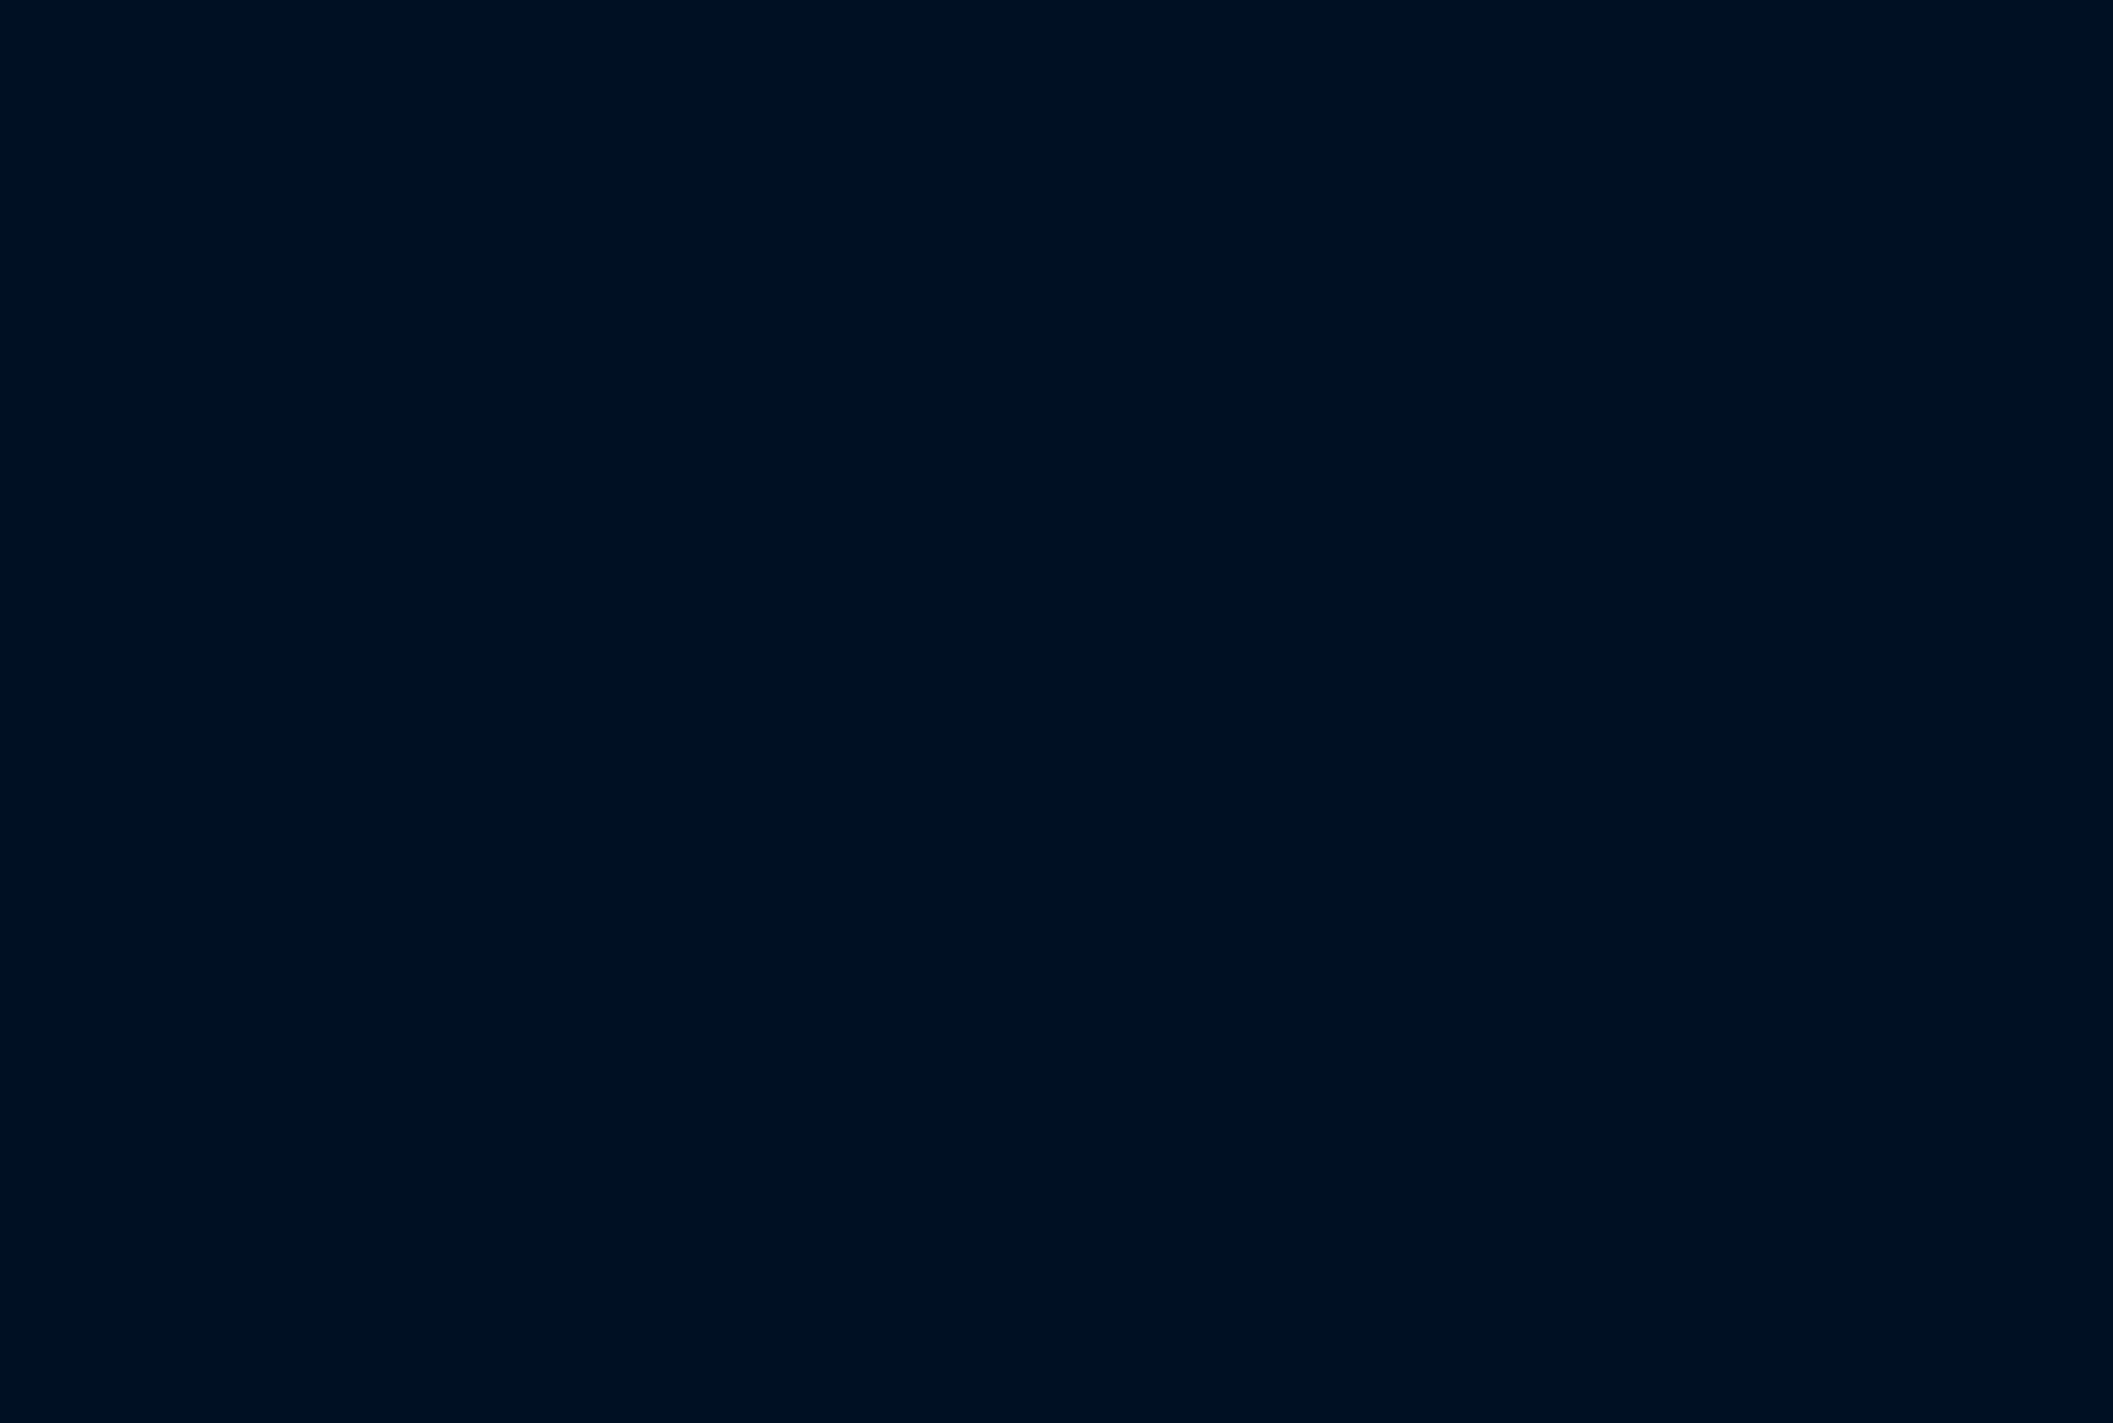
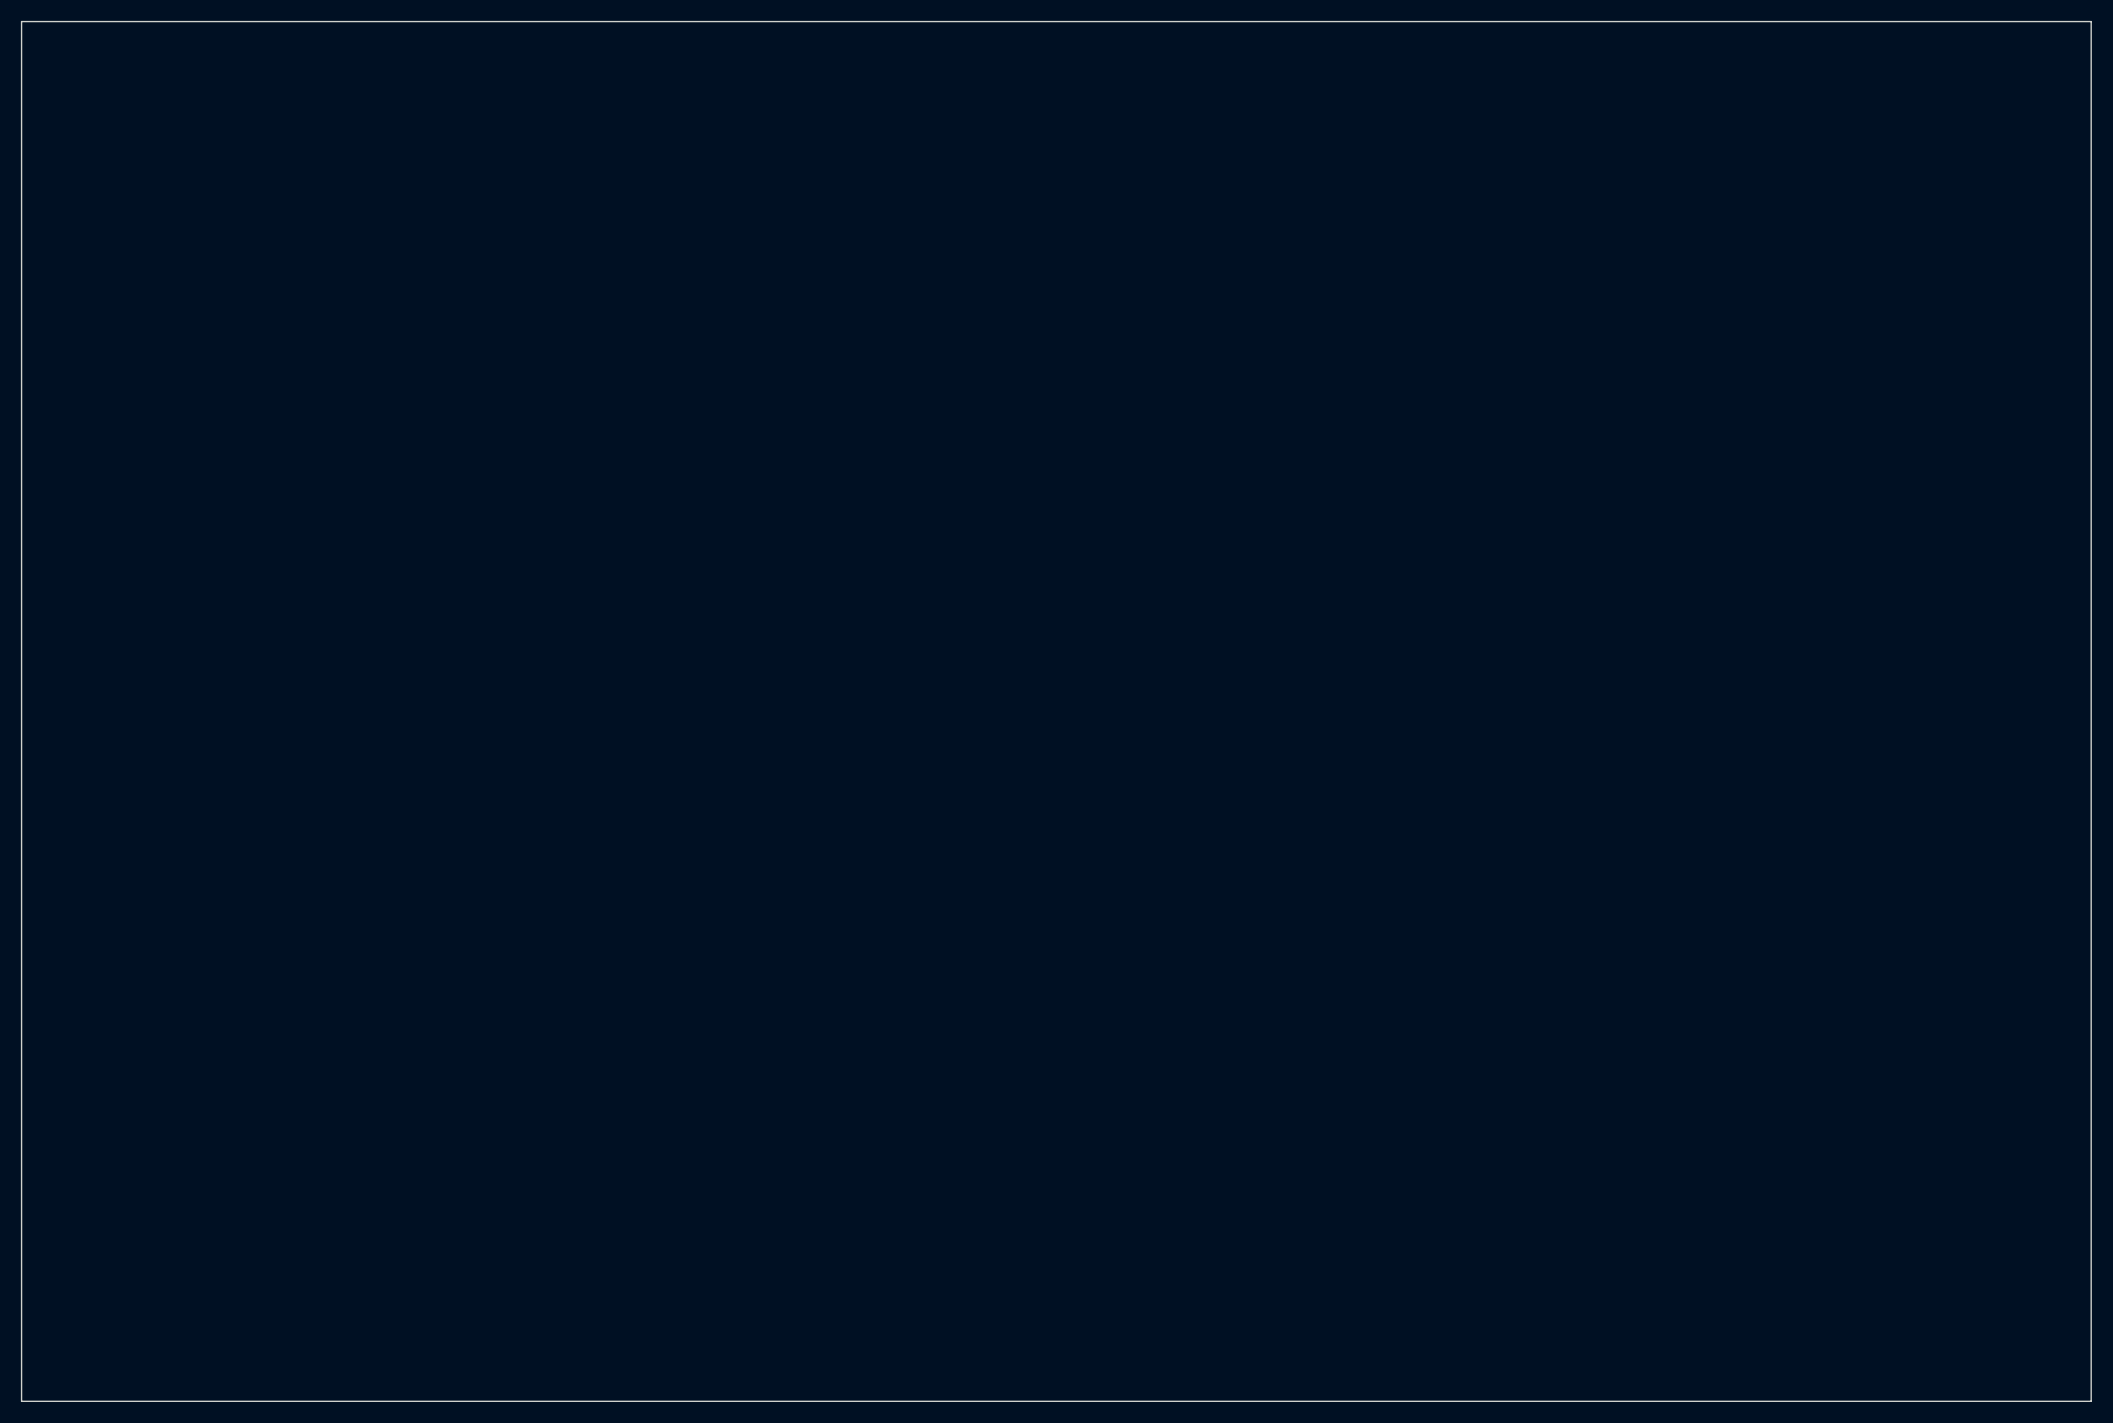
board edge: none -> (21, 21) (2091, 21) (2091, 1401) (21, 1401) (21, 21)

